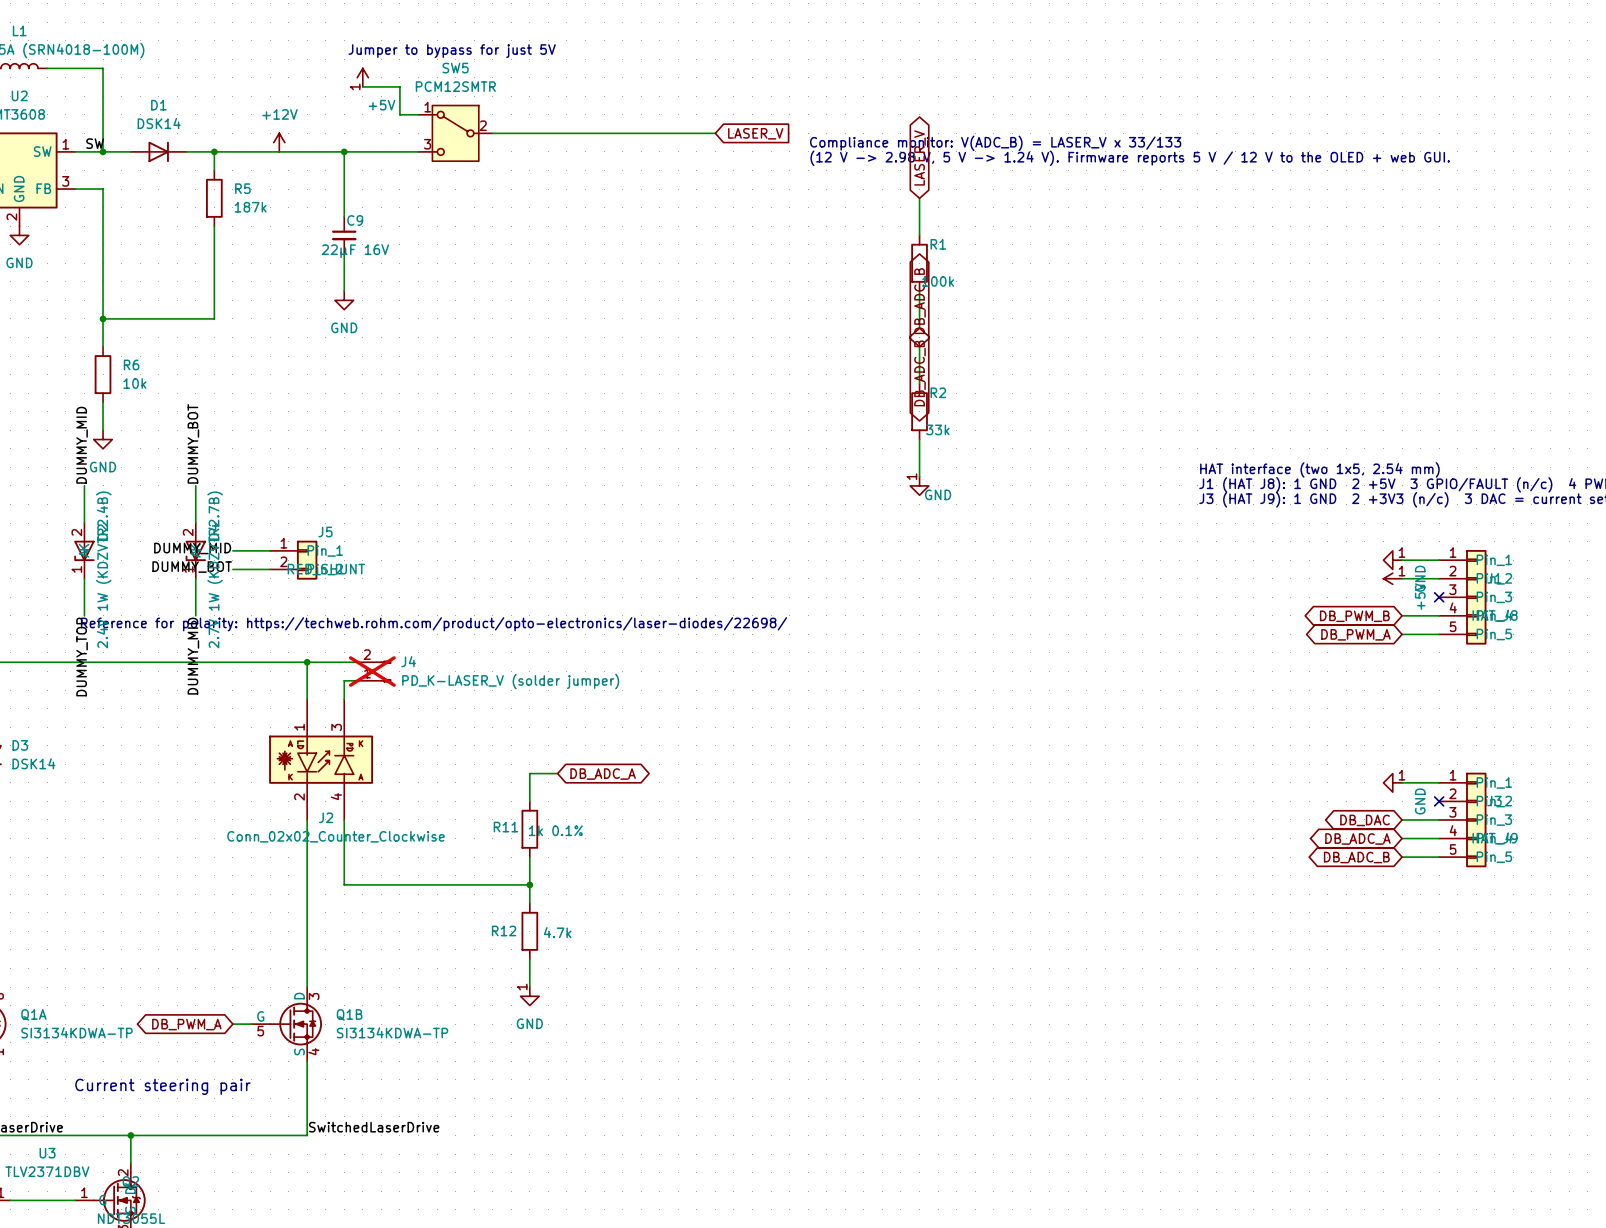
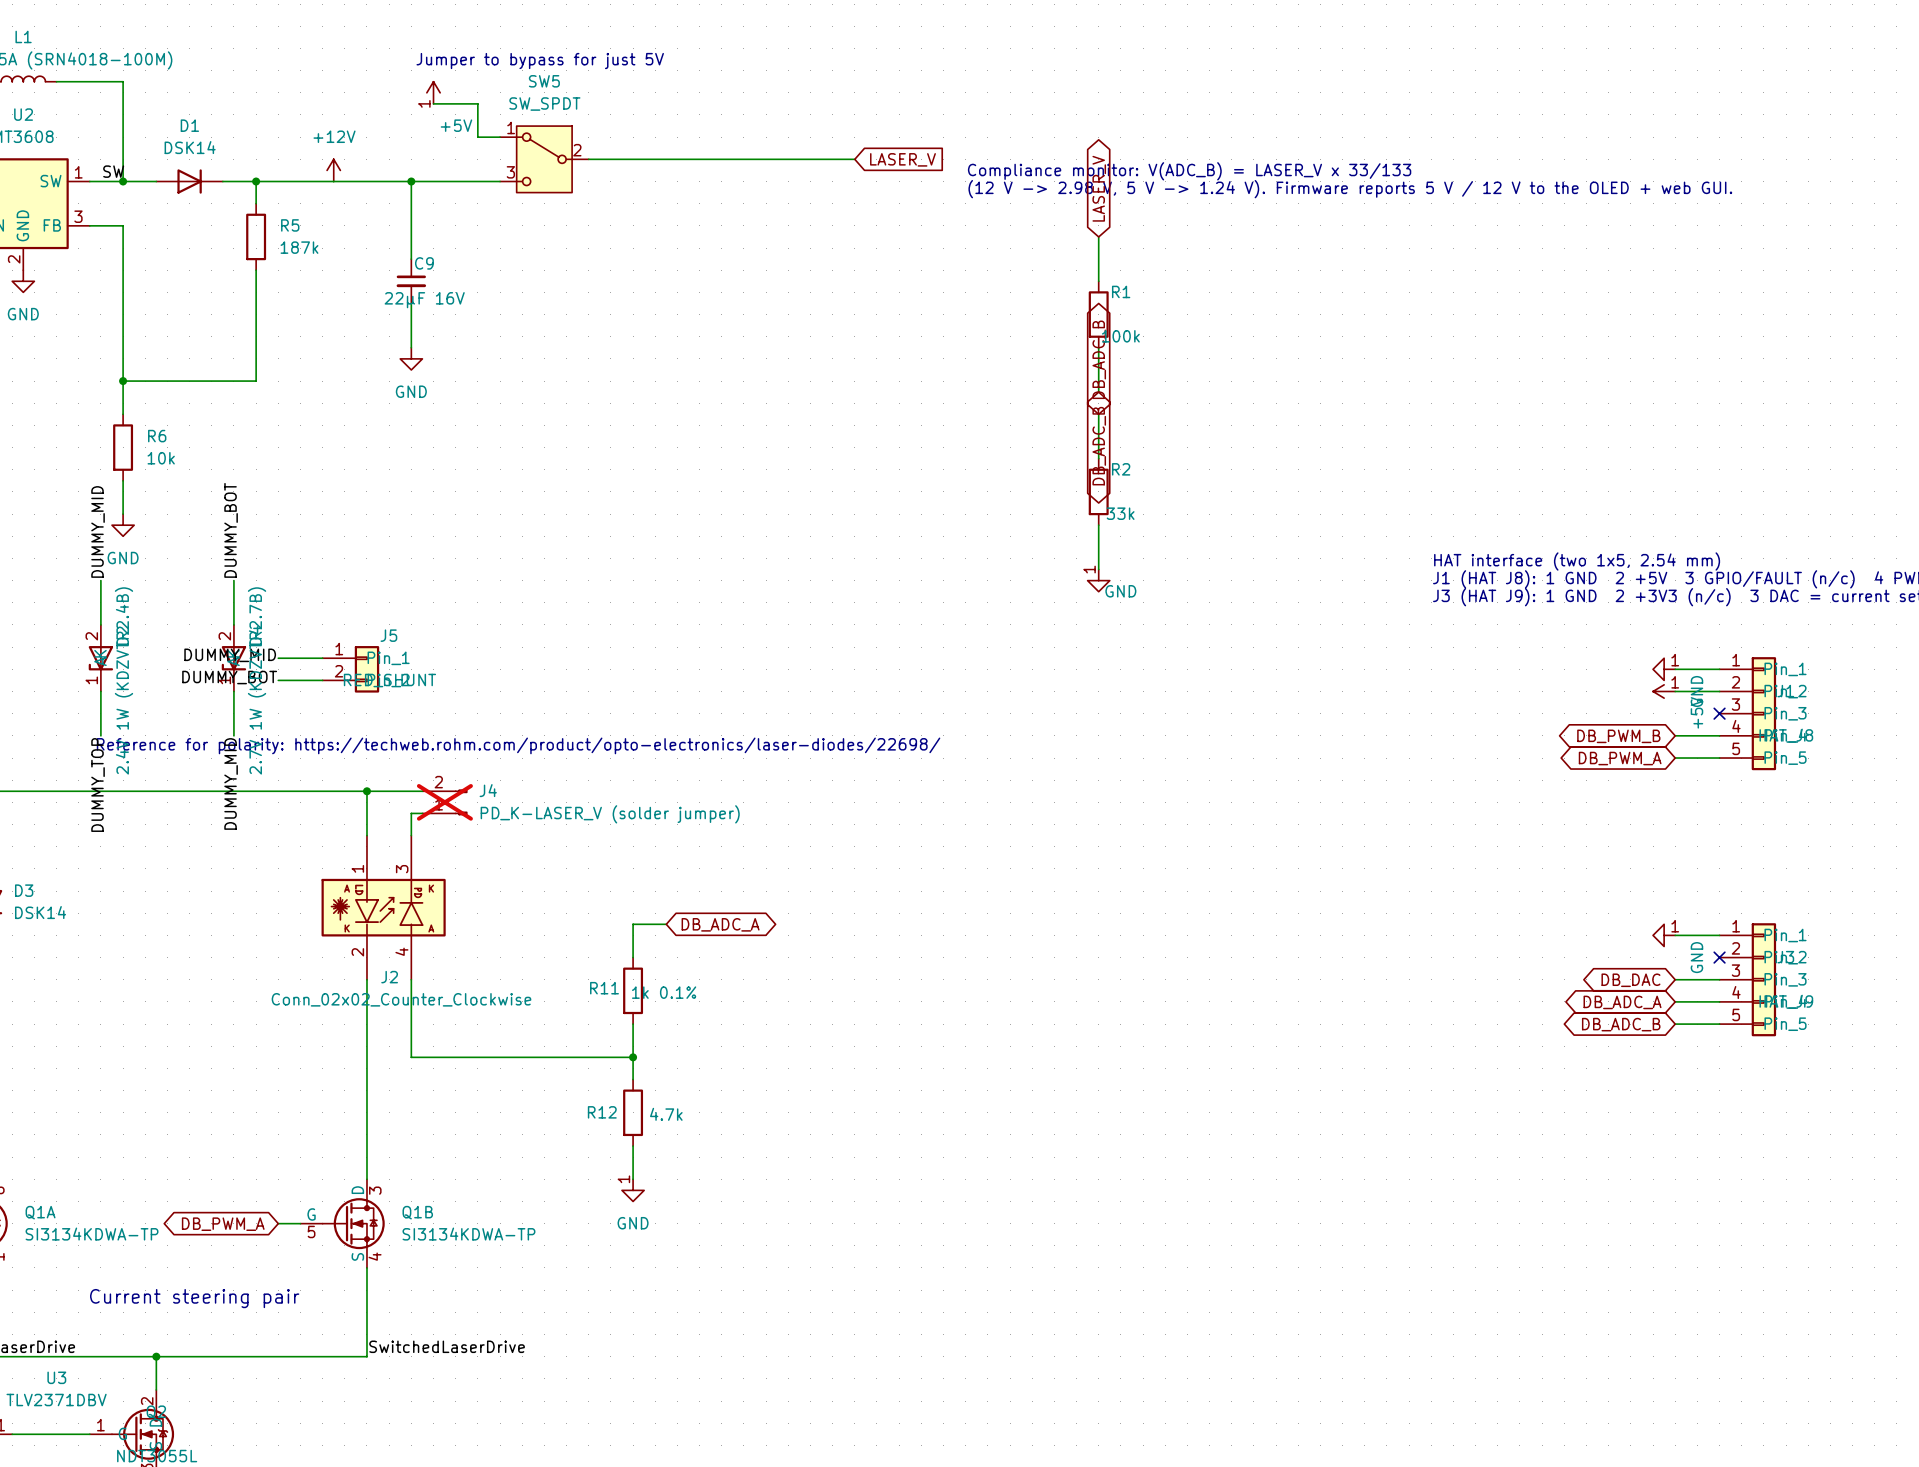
SW5 value: PCM12SMTR (455, 86) -> SW_SPDT (544, 104)

